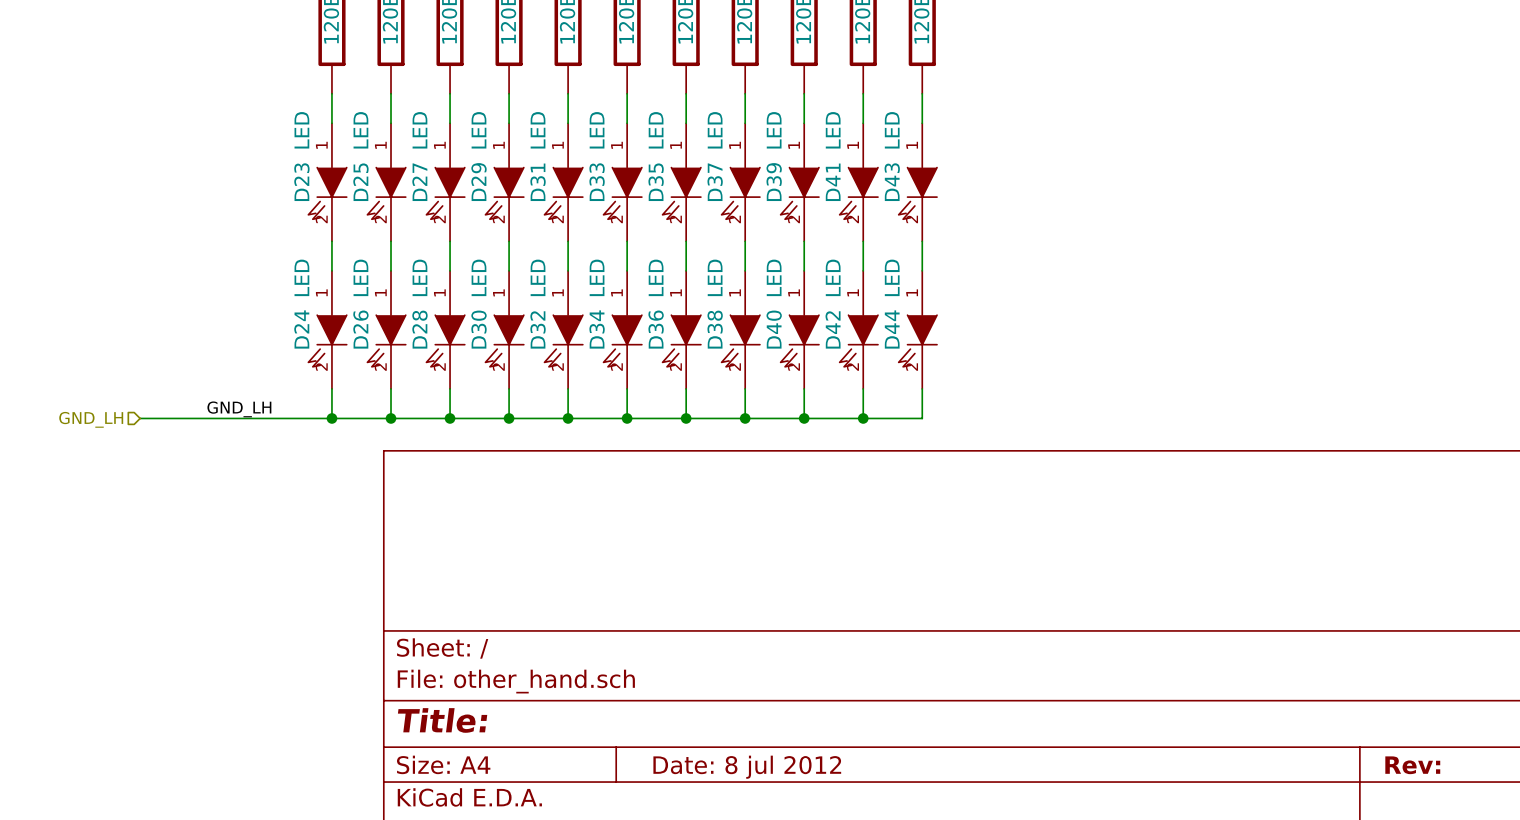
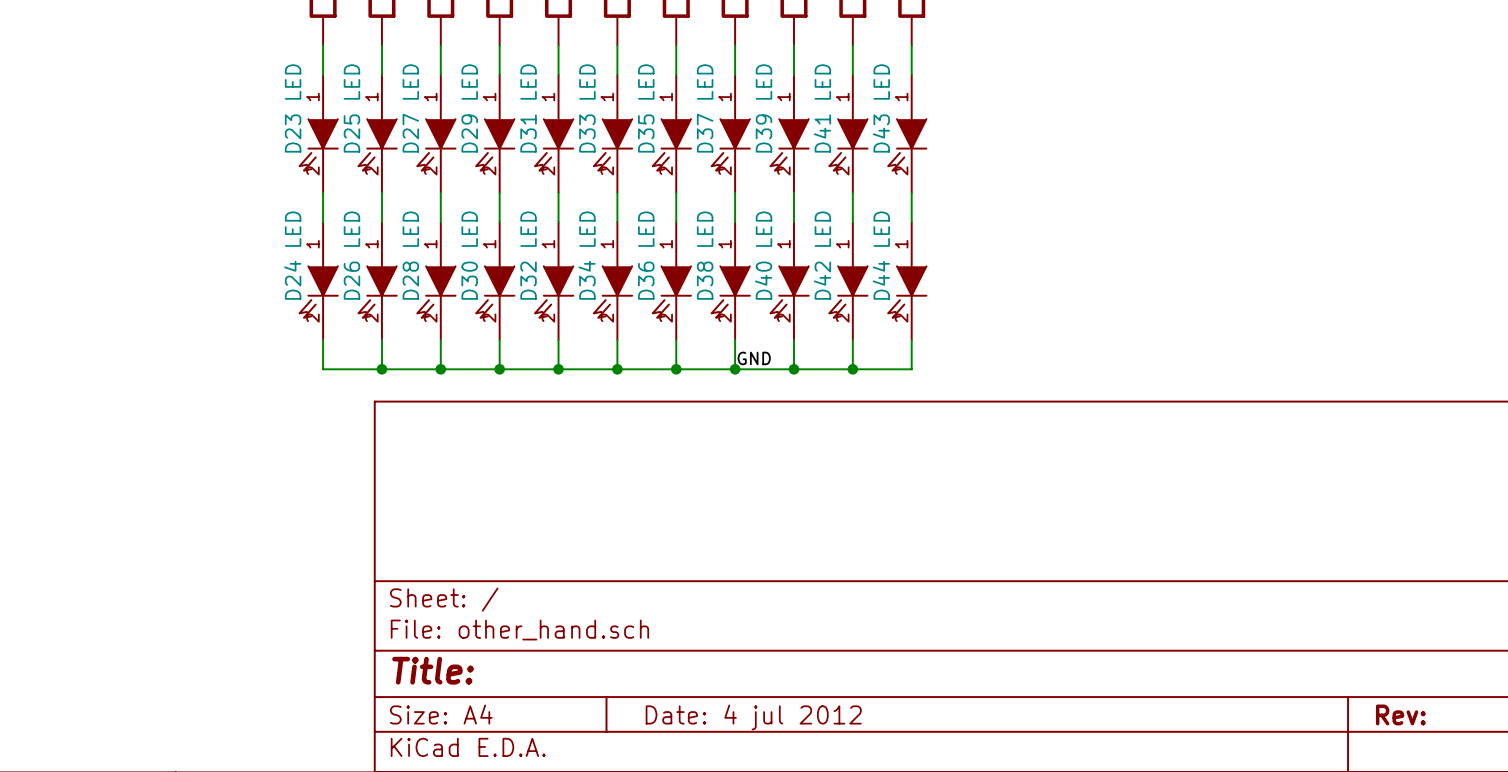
label: none -> GND (754, 358)
label: GND_LH (239, 409) -> none
wire: (140, 418) (331, 418) -> none
junction: (331, 418) -> none
hierarchical label: GND_LH (91, 419) -> none
title block: Date: 8 jul 2012 (747, 767) -> Date: 4 jul 2012 (753, 717)

